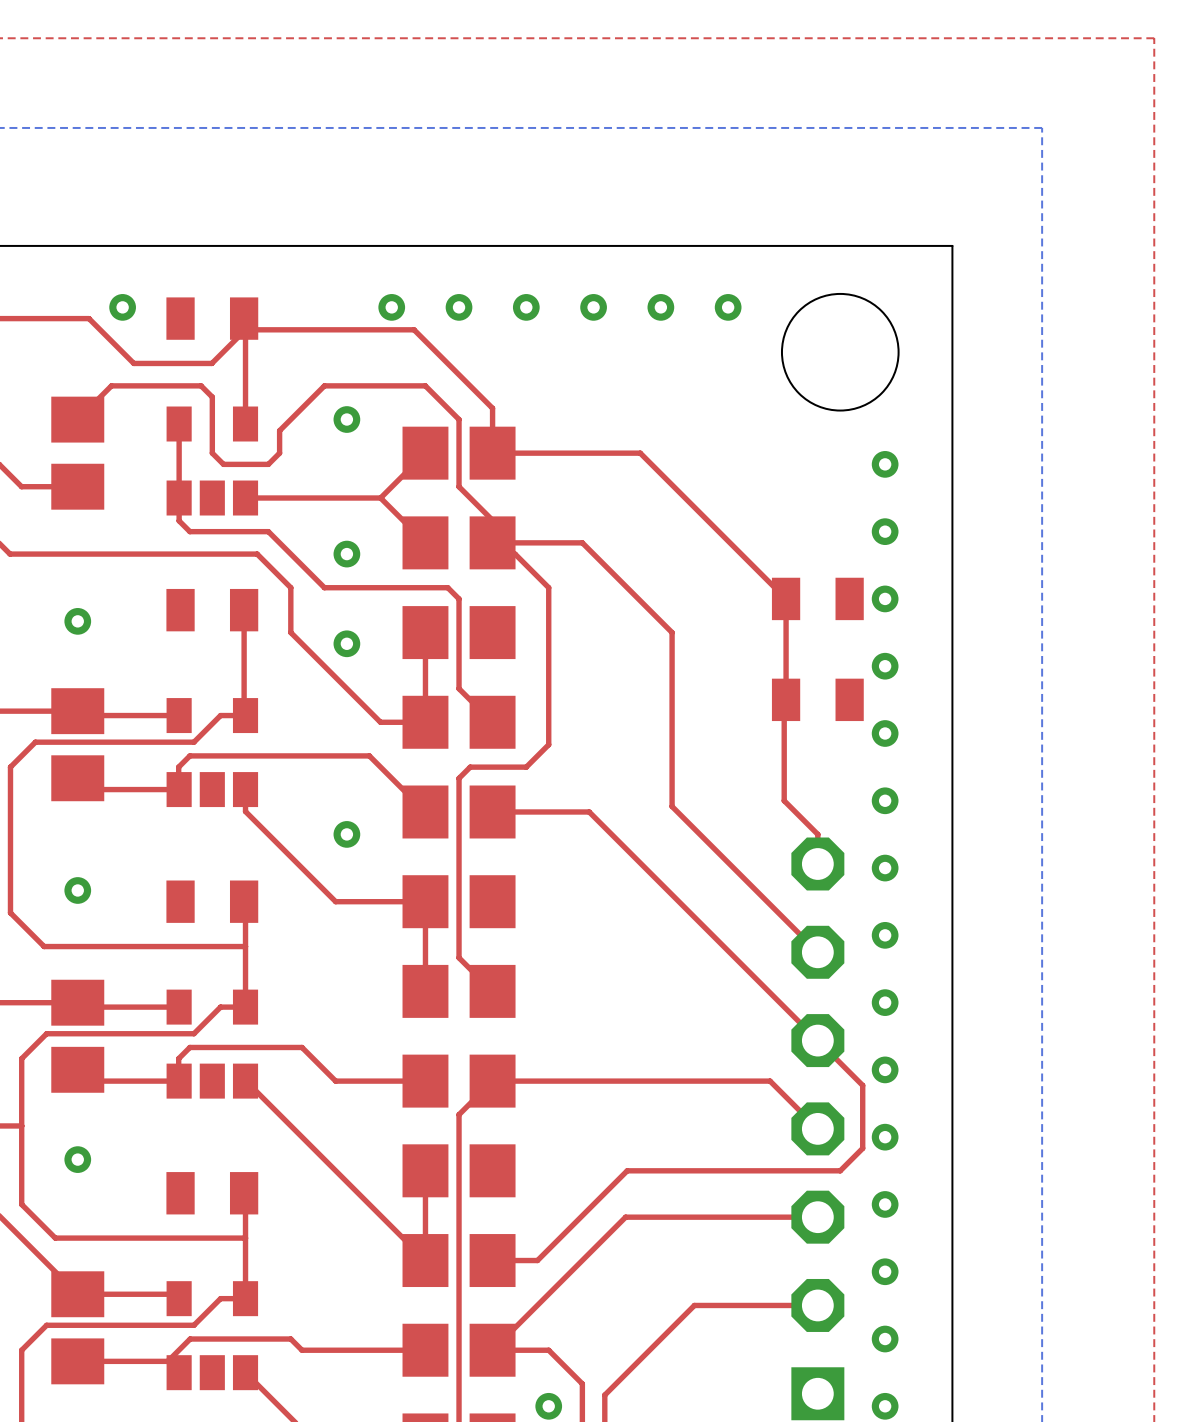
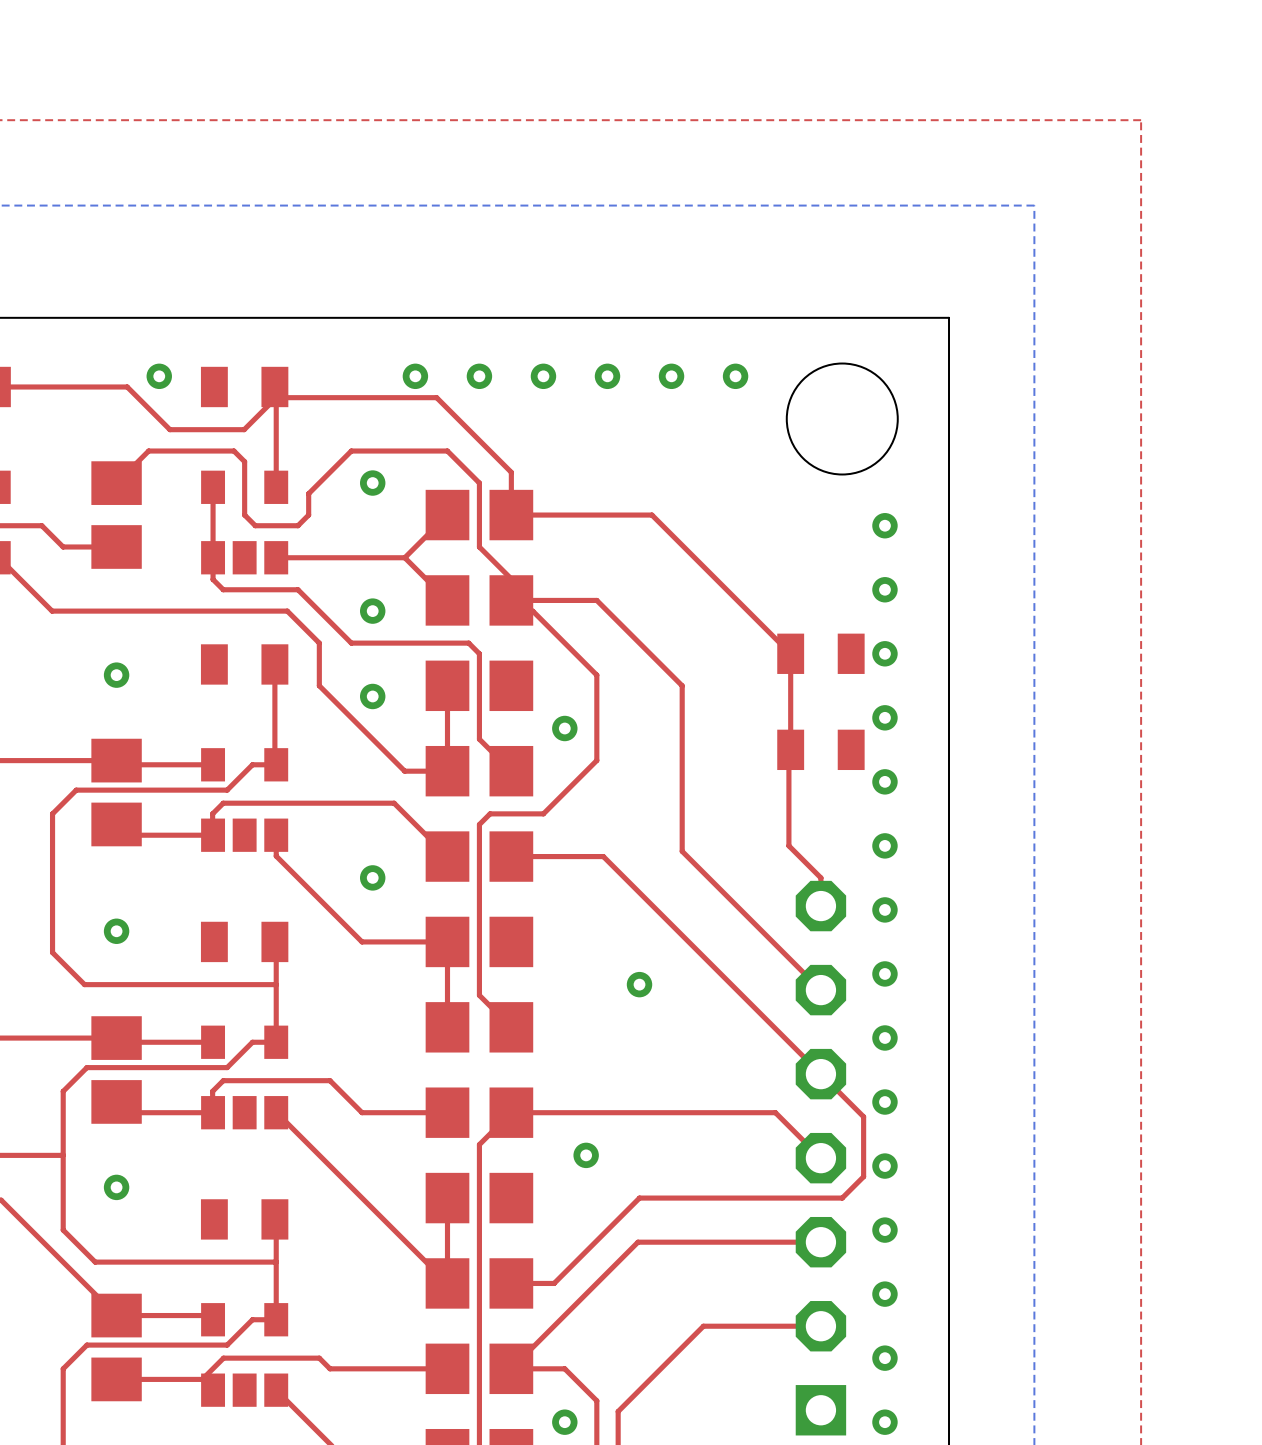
top track: (548, 587) (548, 744) -> (564, 643) (596, 675) (596, 760) (564, 792)
via: none -> (564, 728)
via: none -> (639, 984)
via: none -> (586, 1155)

